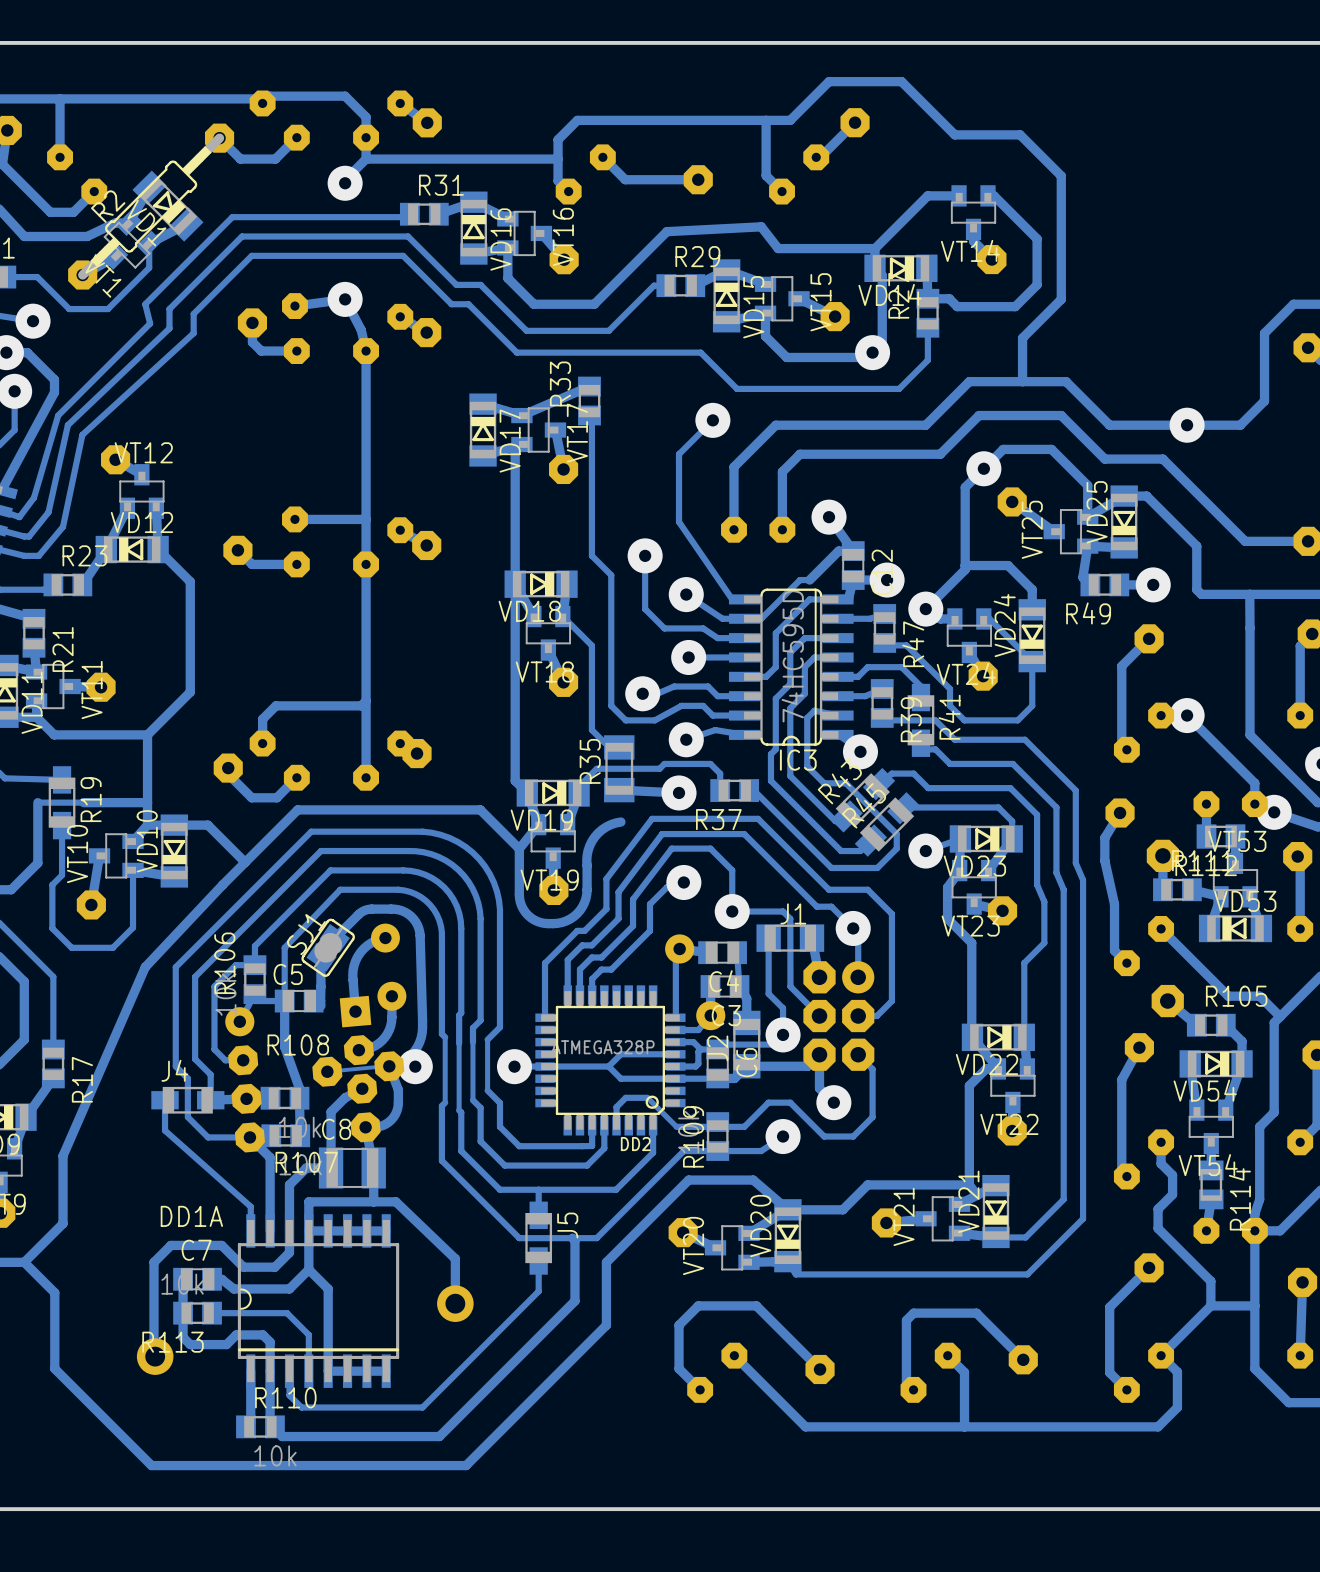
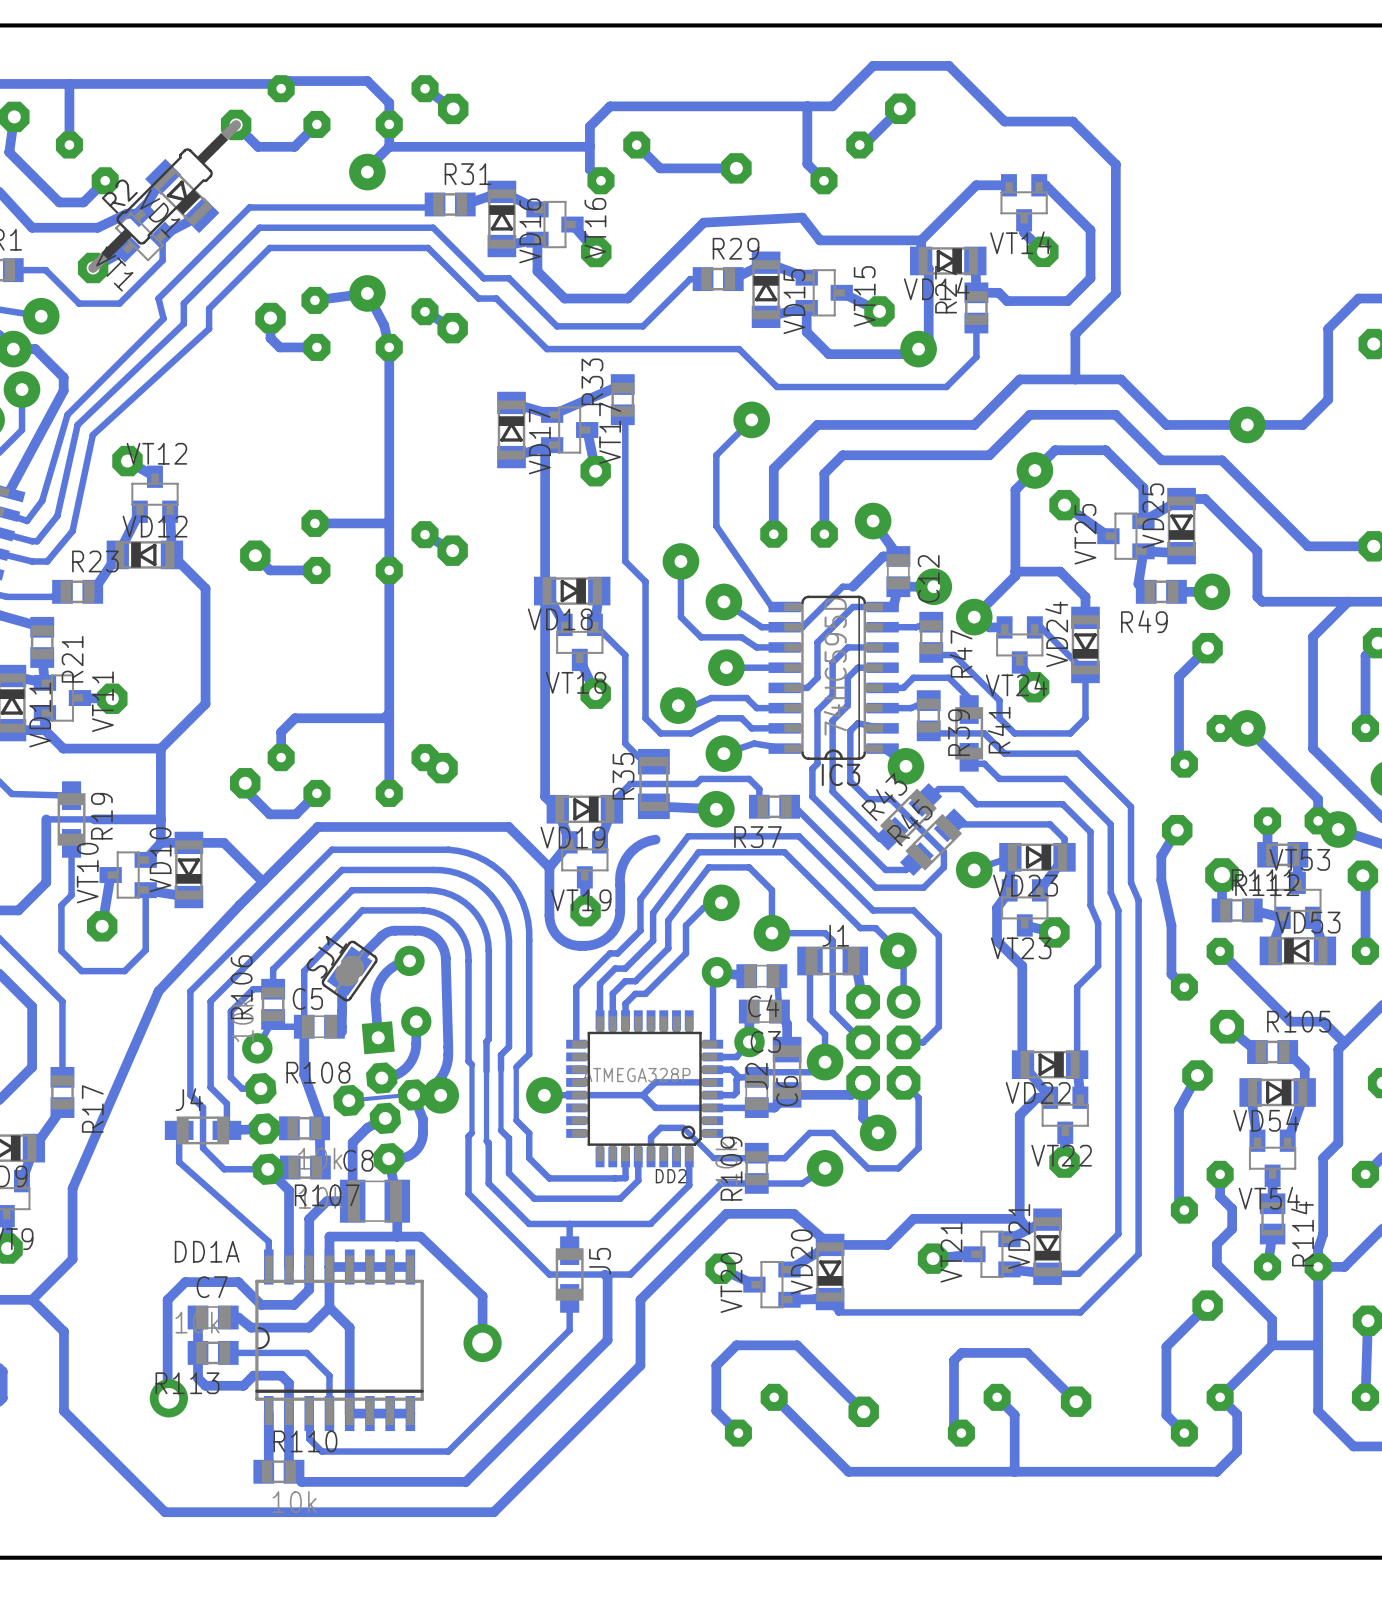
track: (1249, 594) (1250, 627) -> (1348, 601) (1313, 636)

